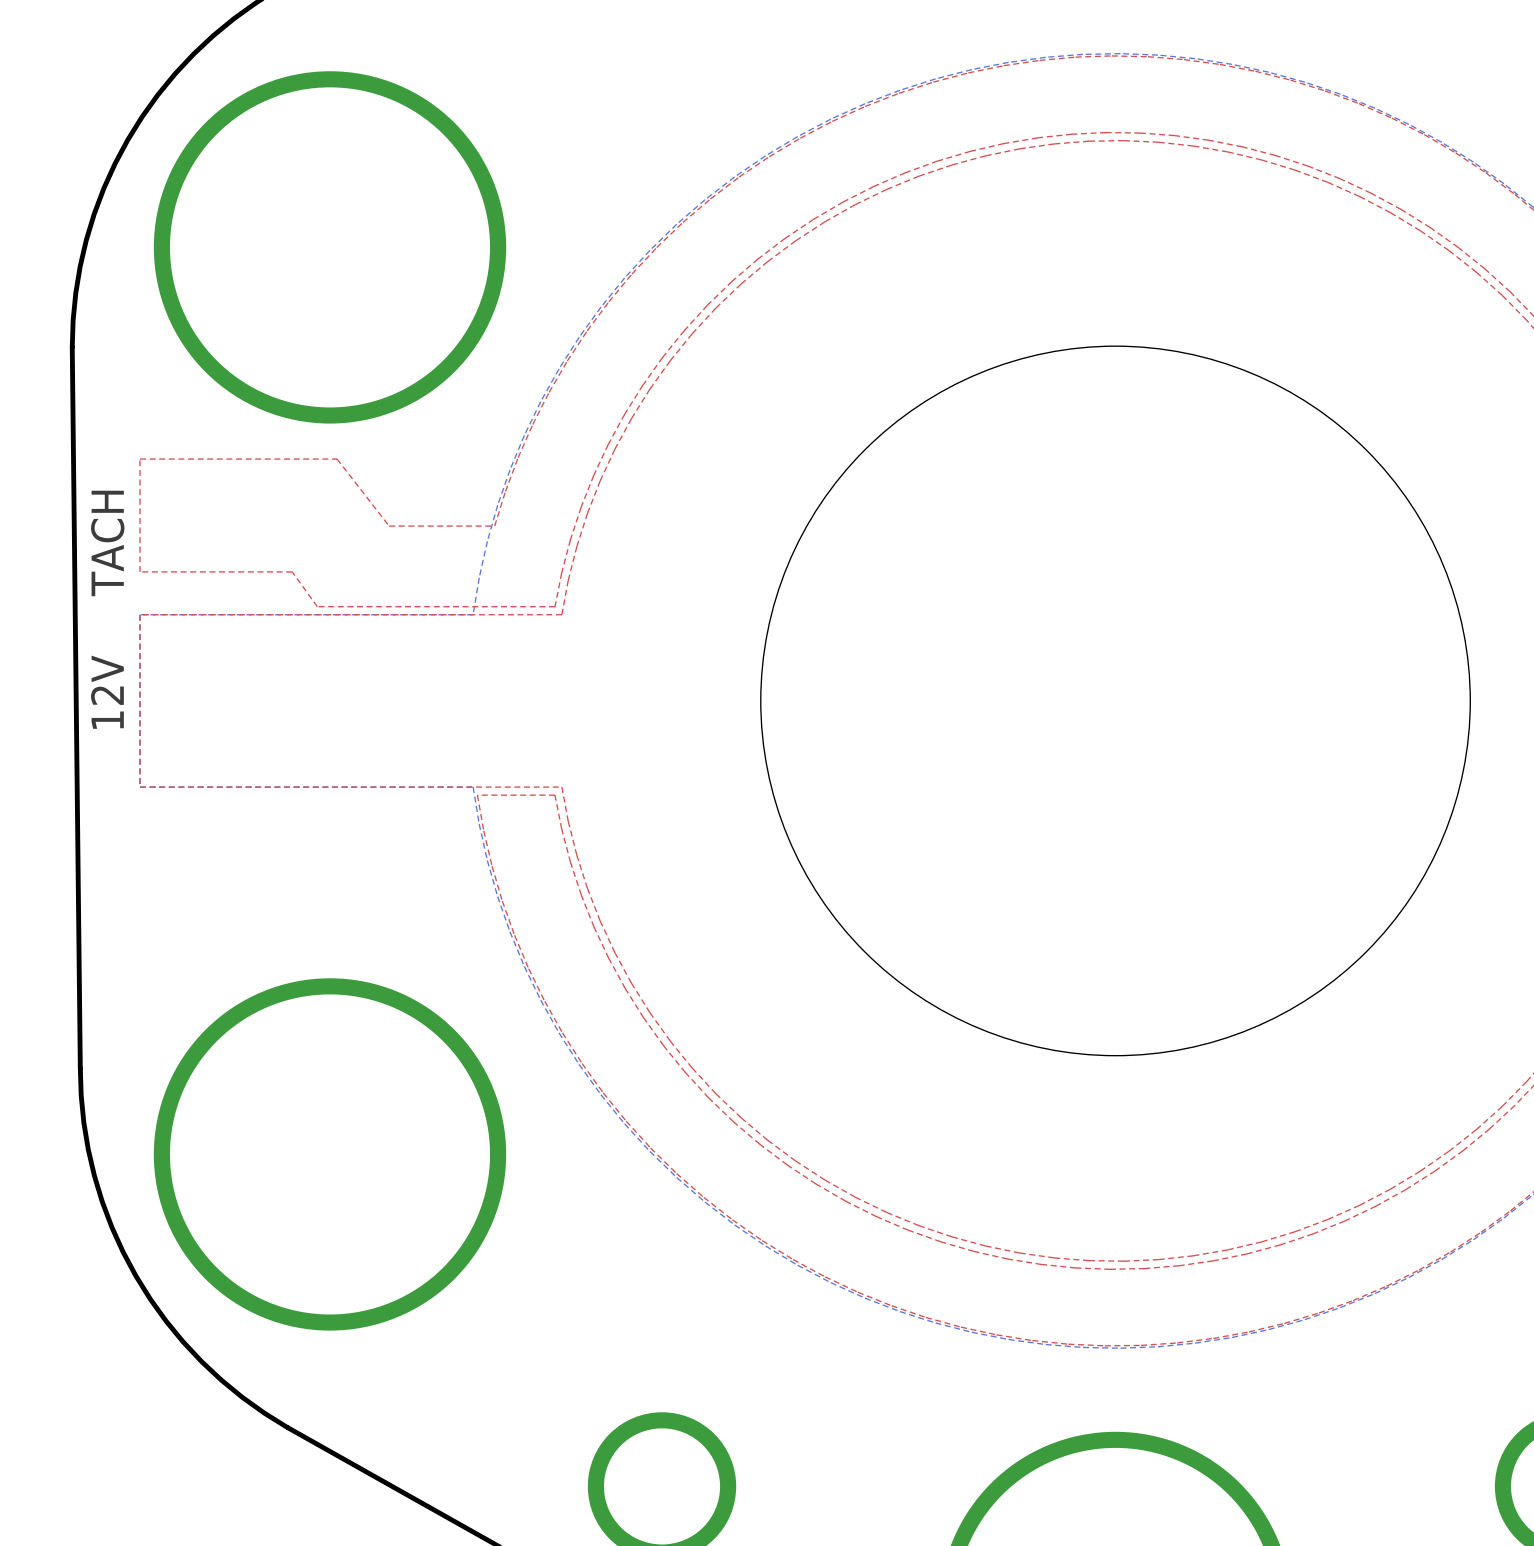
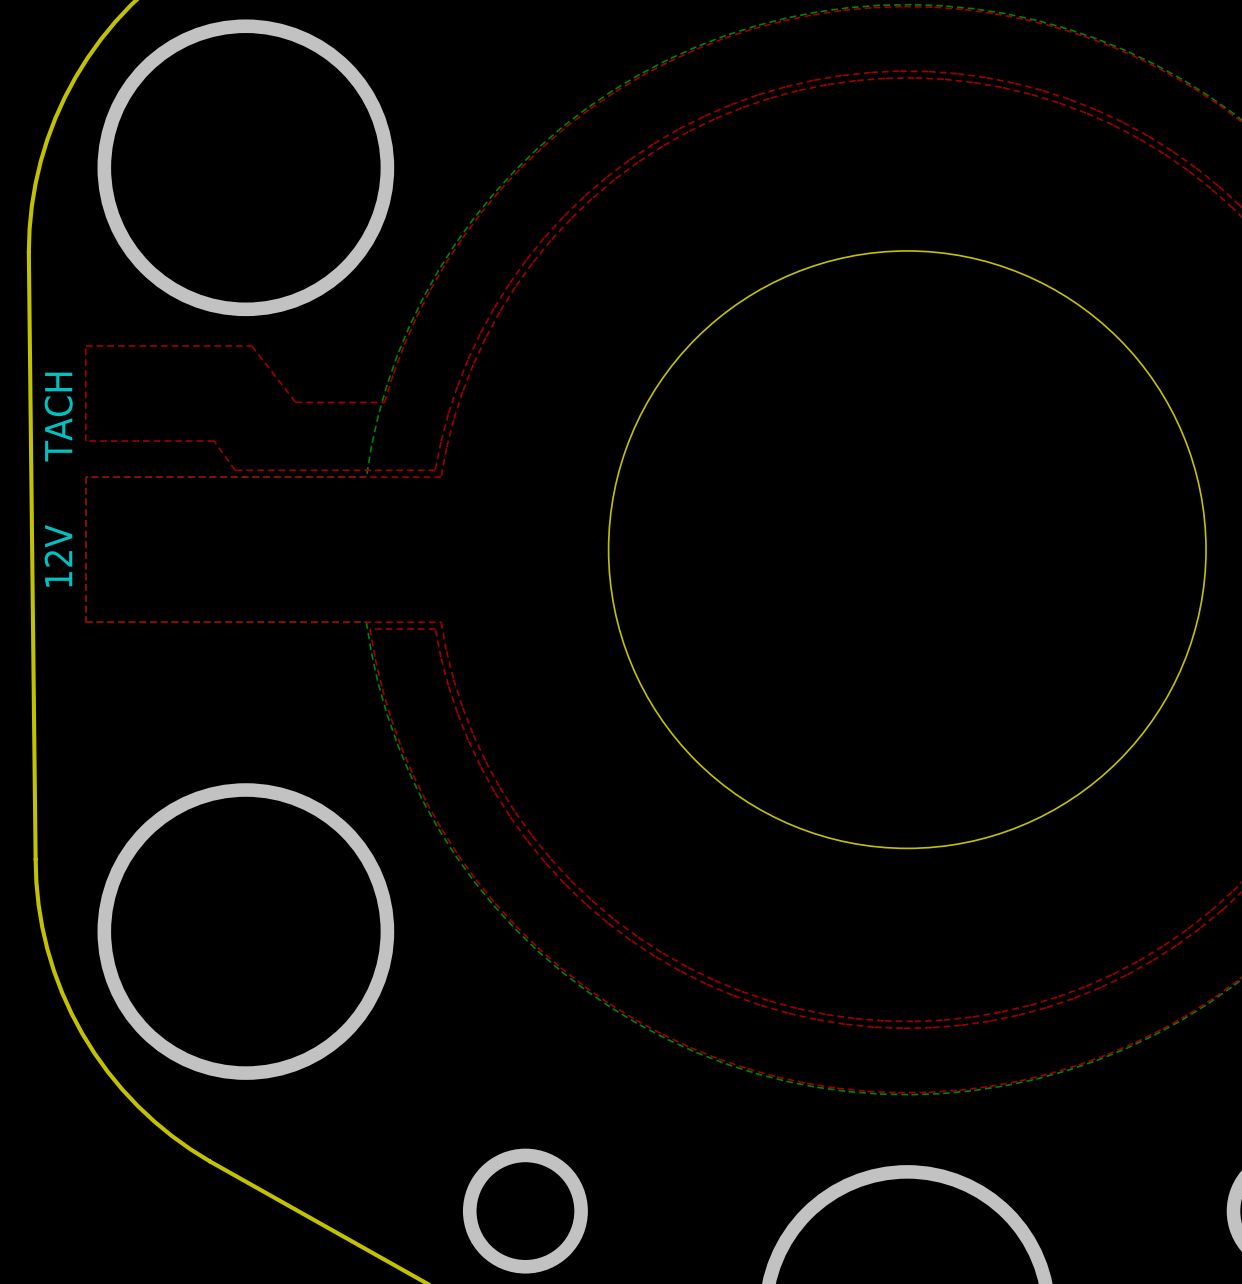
text position: 12V (107, 692) -> 12V (58, 555)

